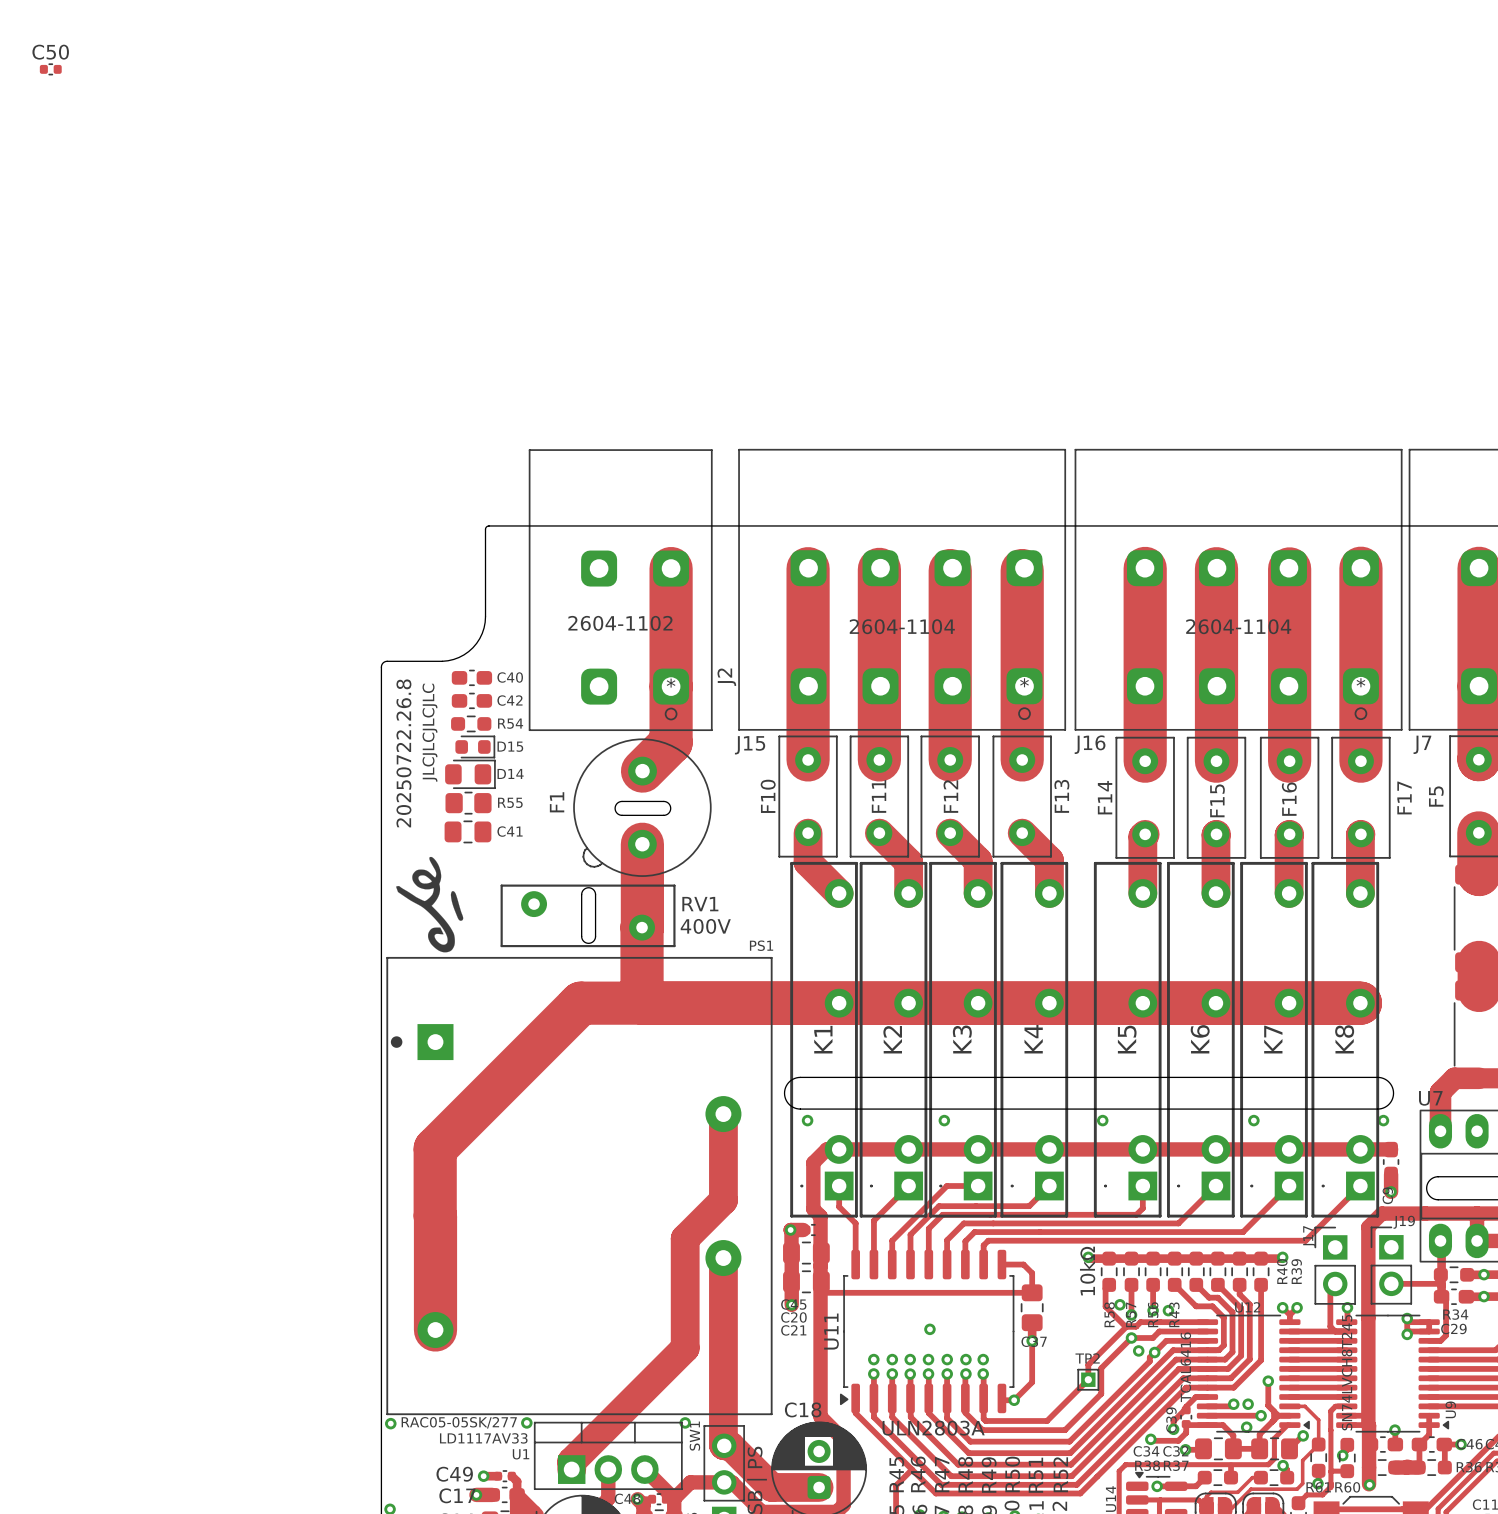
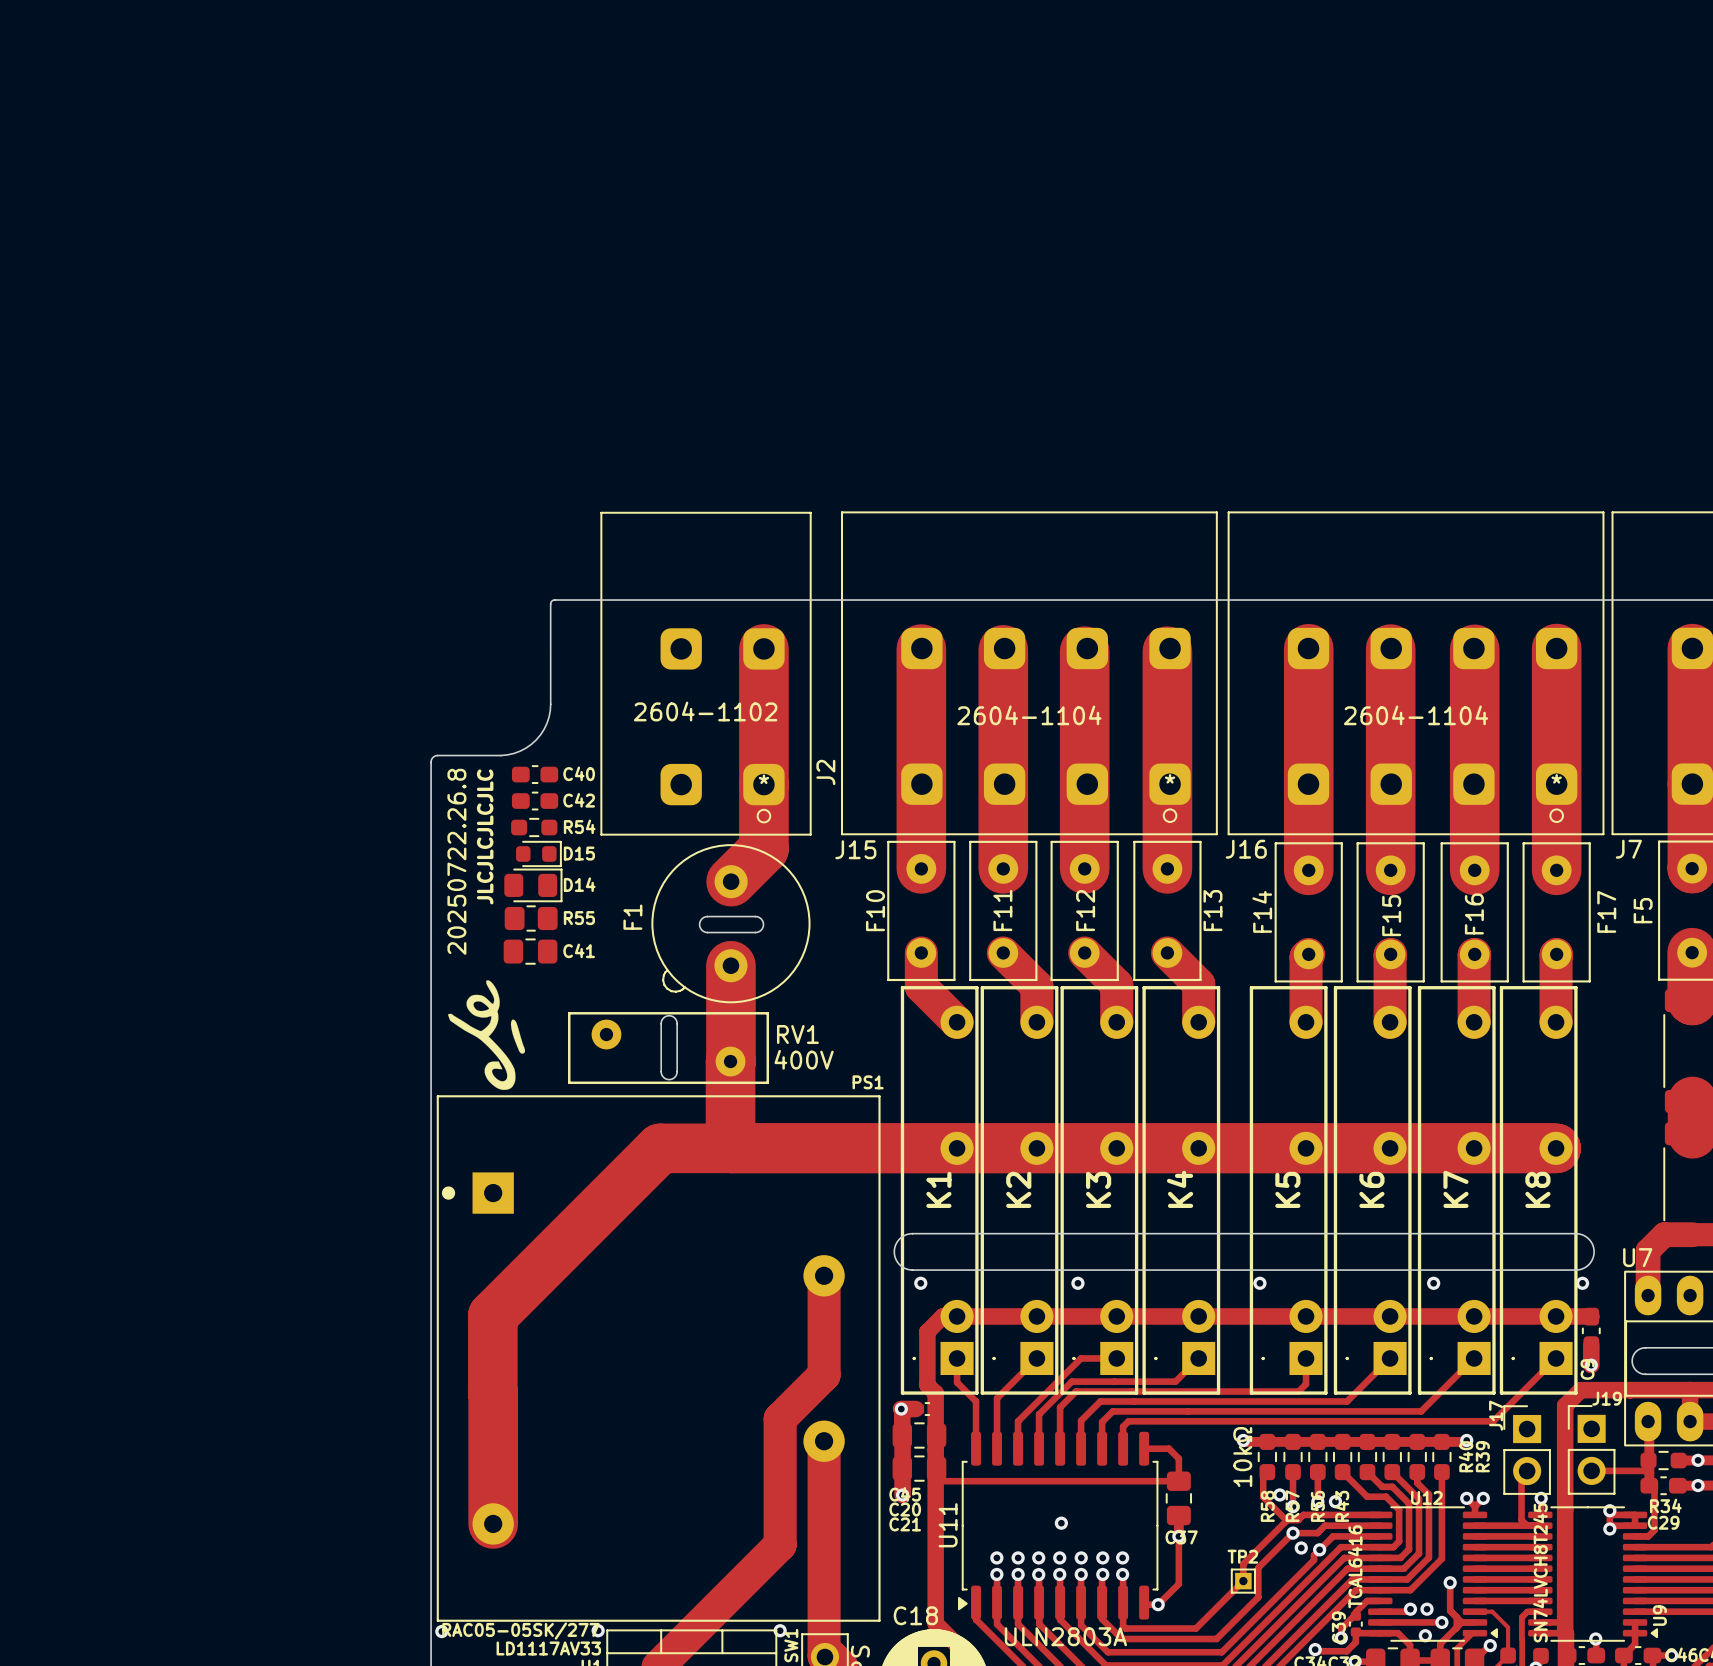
C50: (50, 69) -> none

